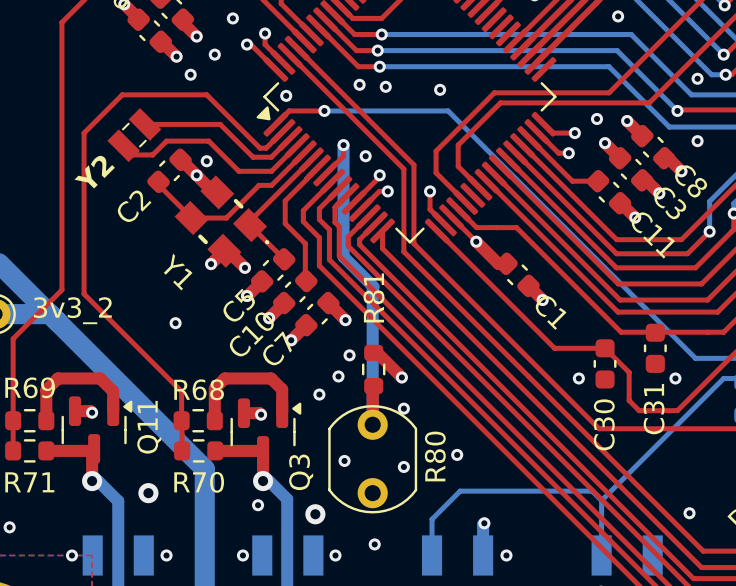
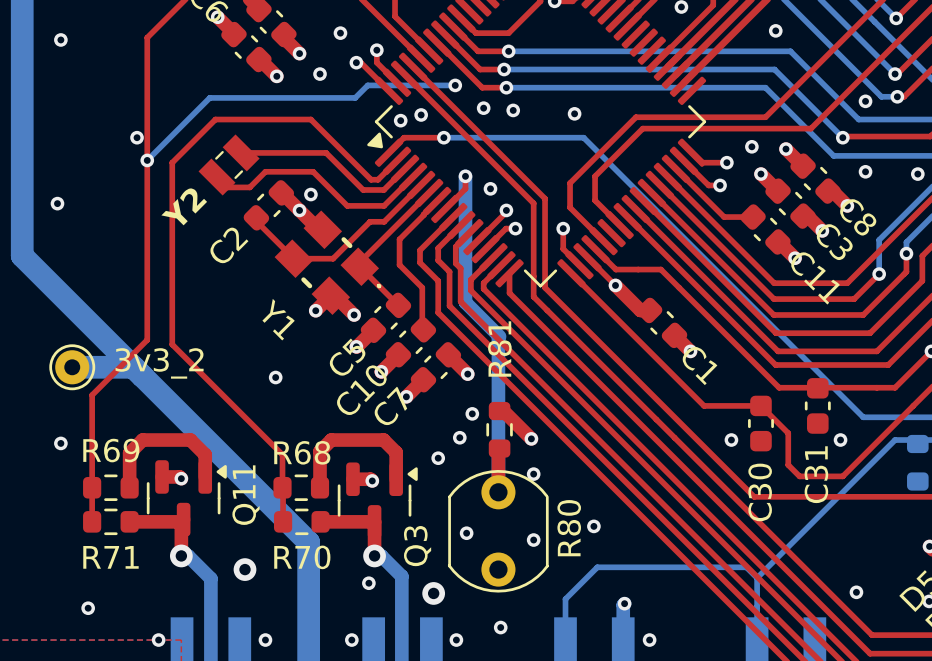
bottom track: none -> (455, 85) (367, 85) (355, 97) (209, 97) (147, 160)
via: none -> (455, 85)
via: (190, 74) -> none
via: none -> (421, 114)
via: none -> (137, 137)
via: none -> (147, 160)

